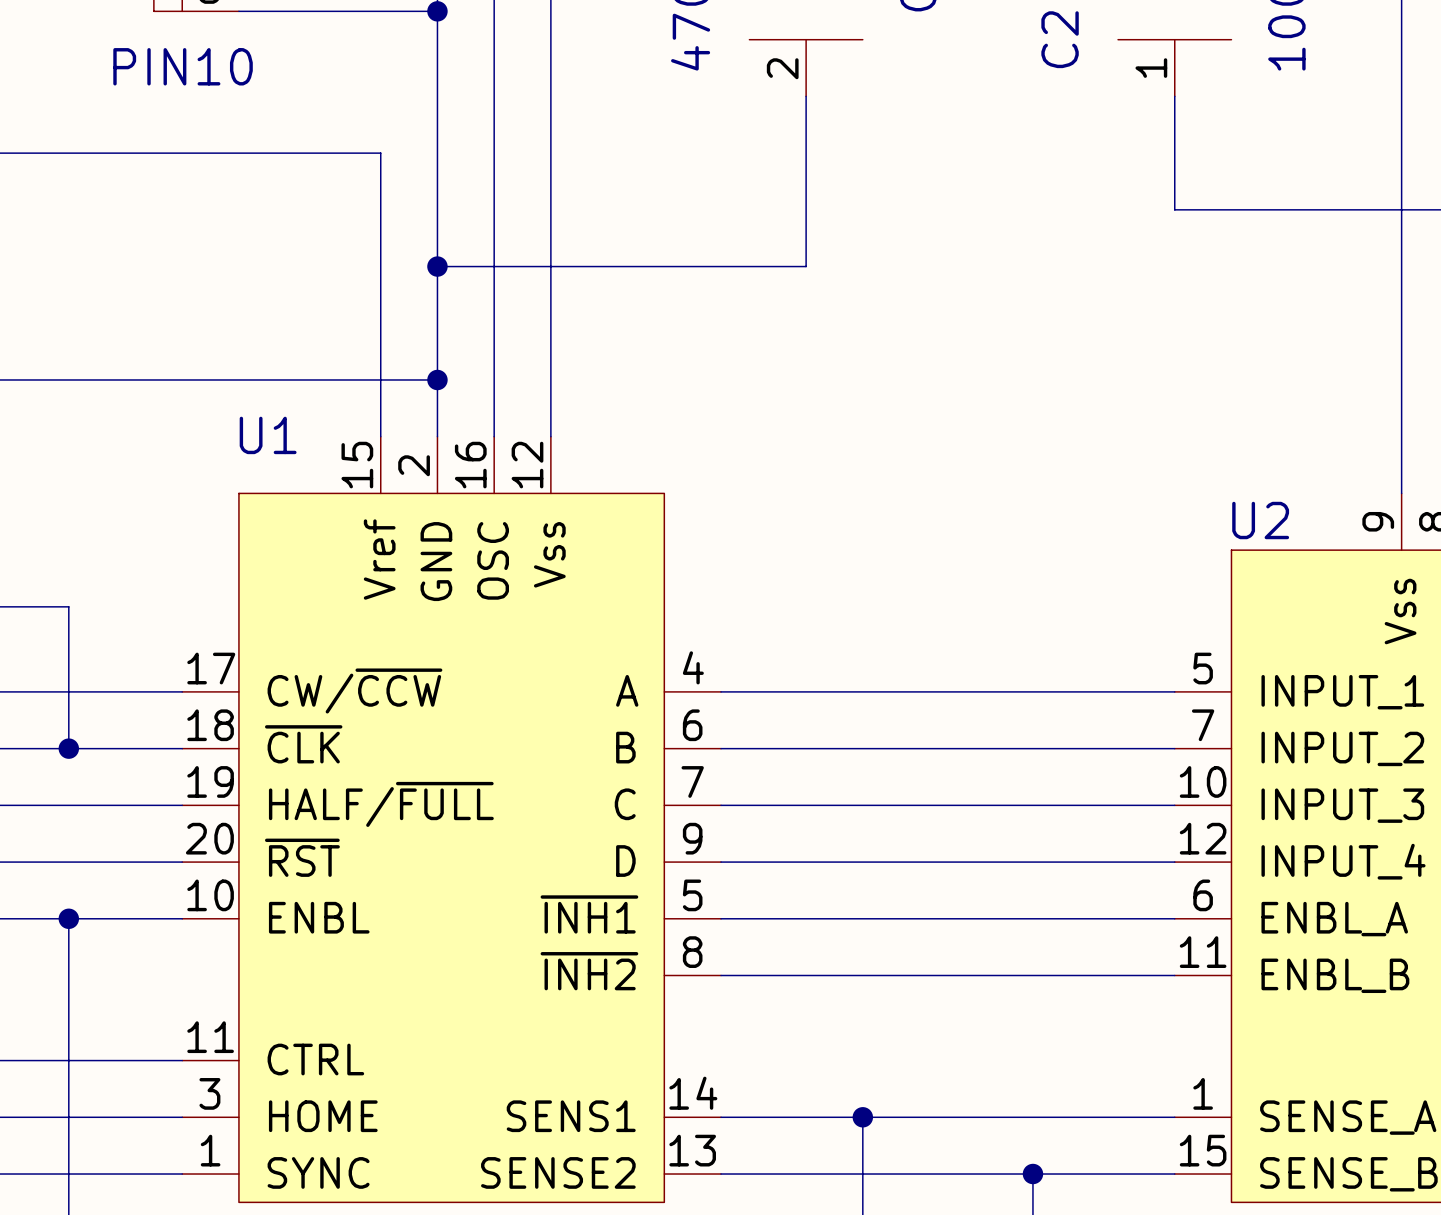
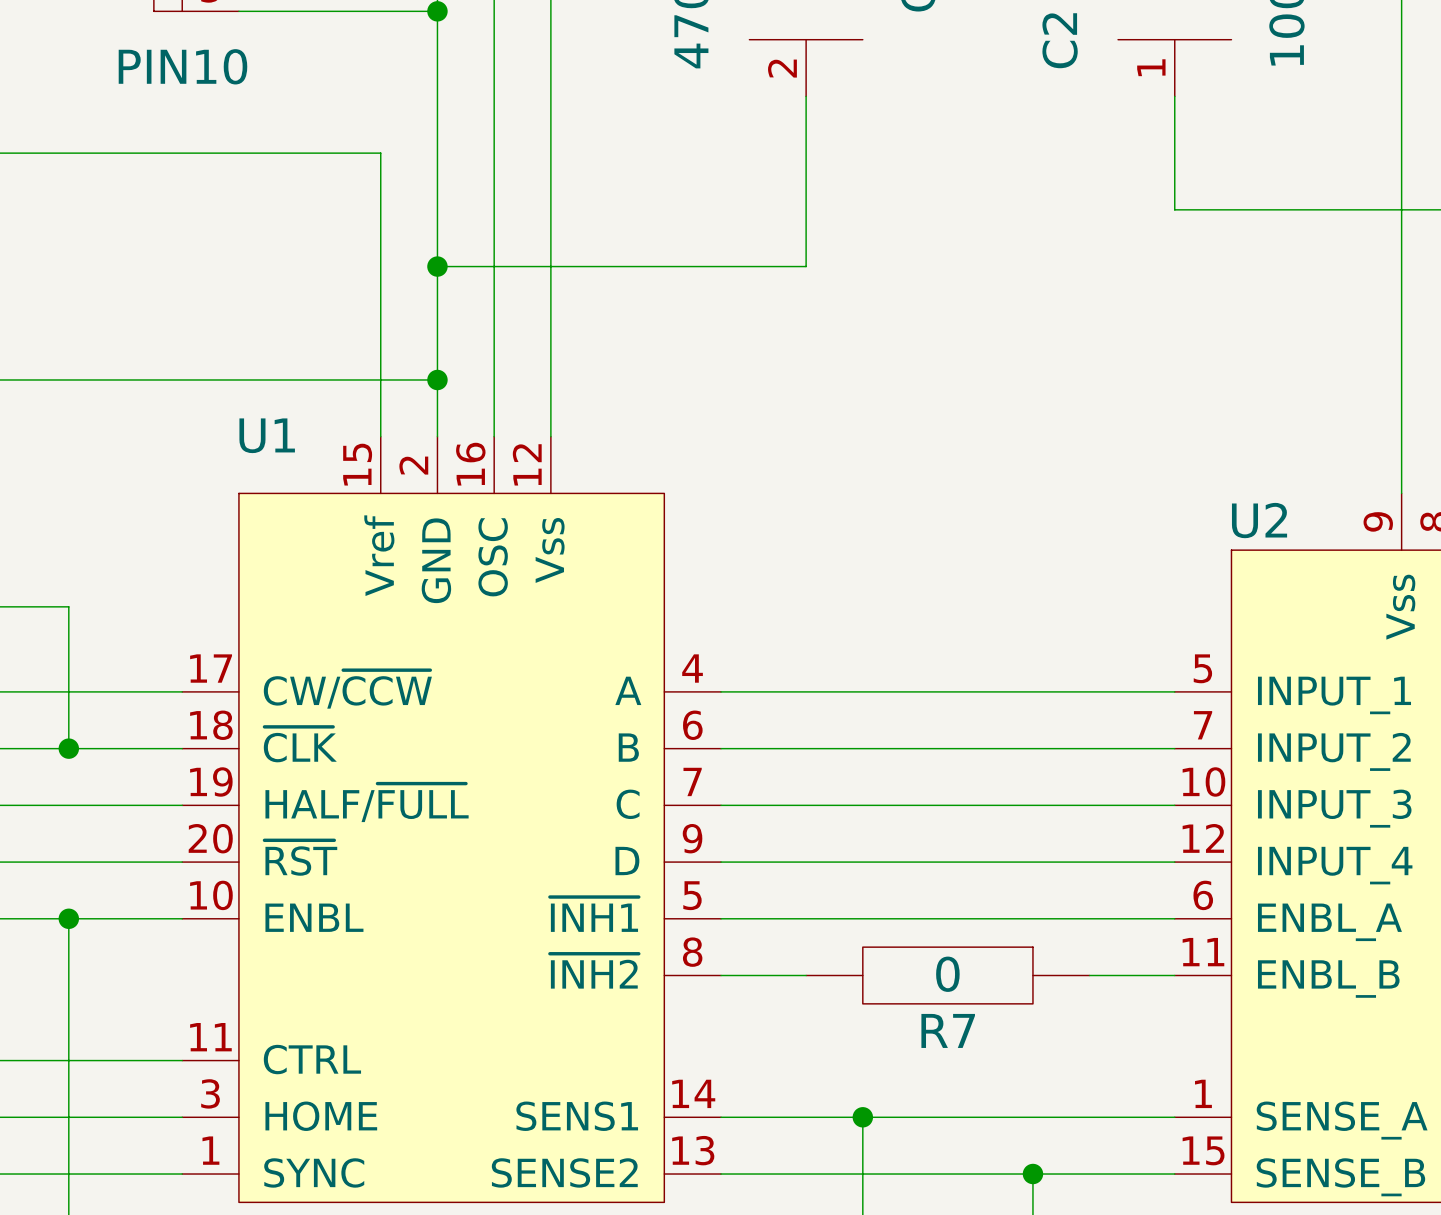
wire: (806, 975) (1089, 975) -> none
R7: none -> 0 (947, 975)

